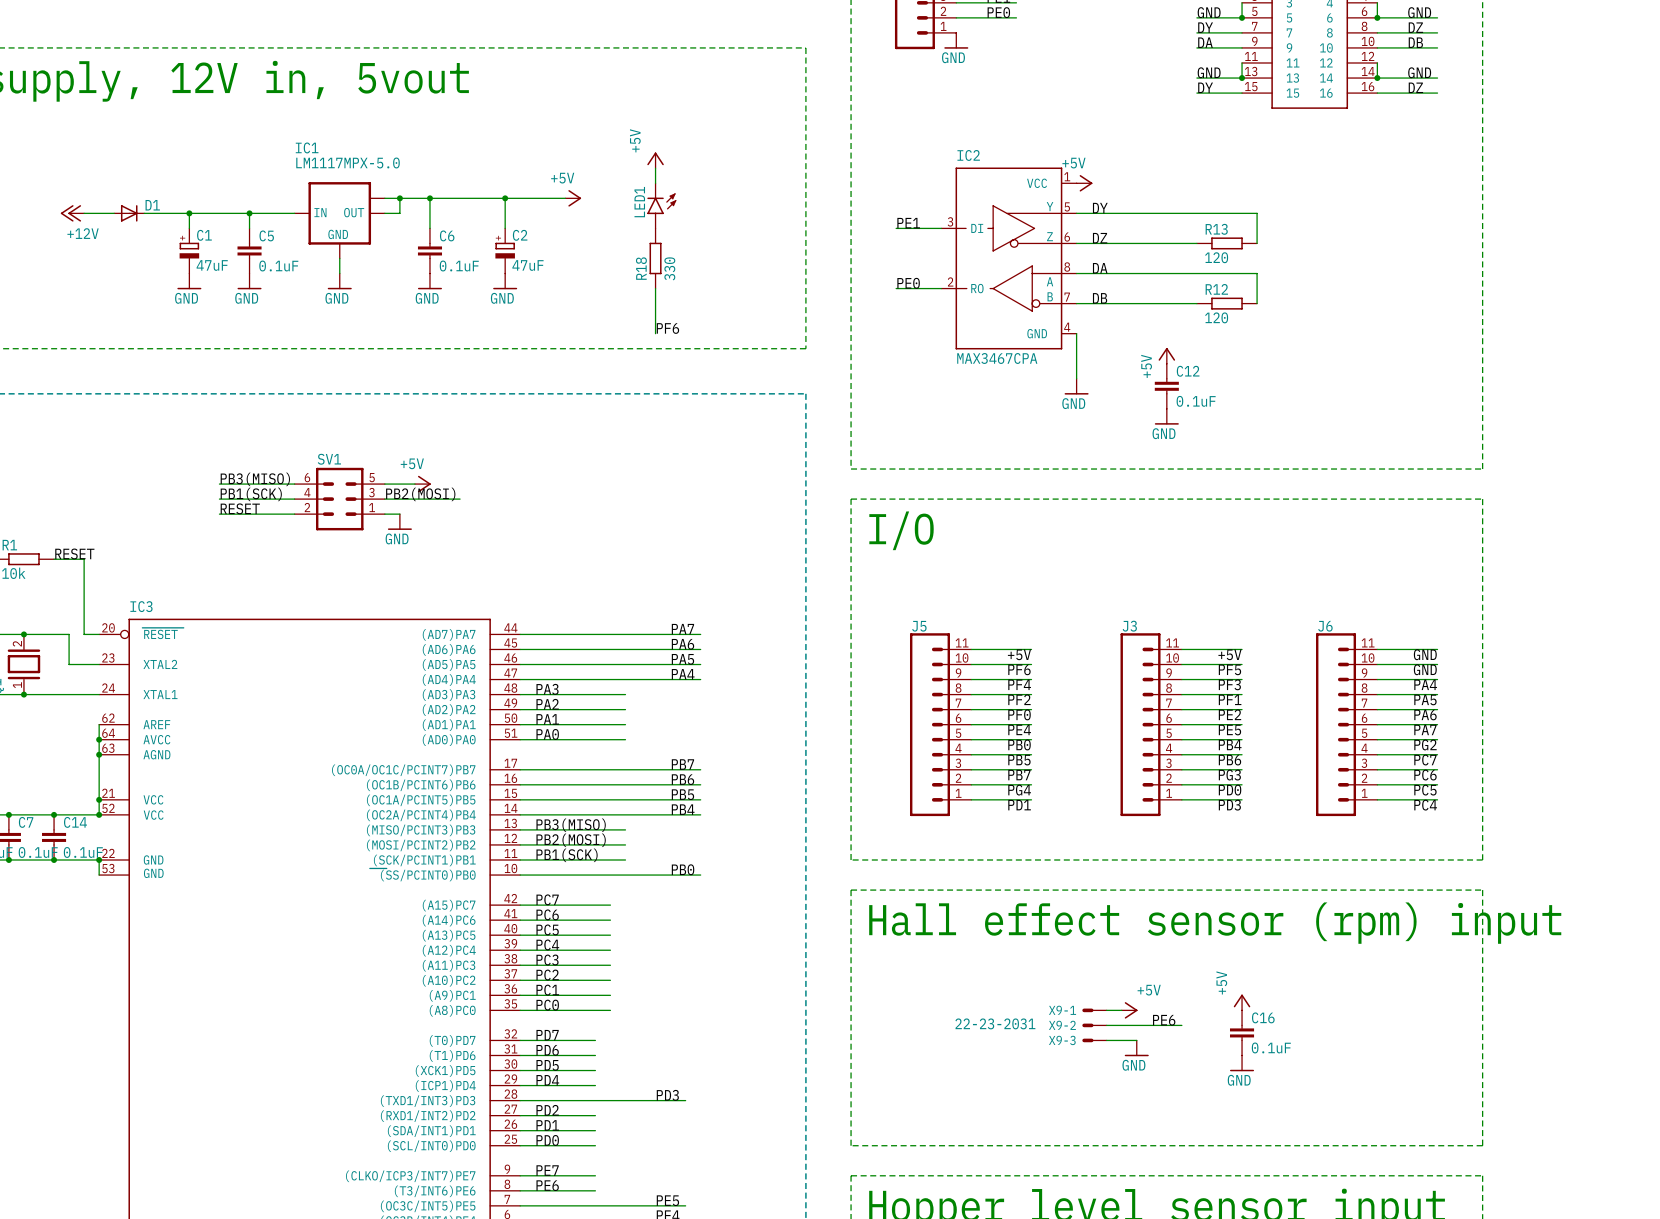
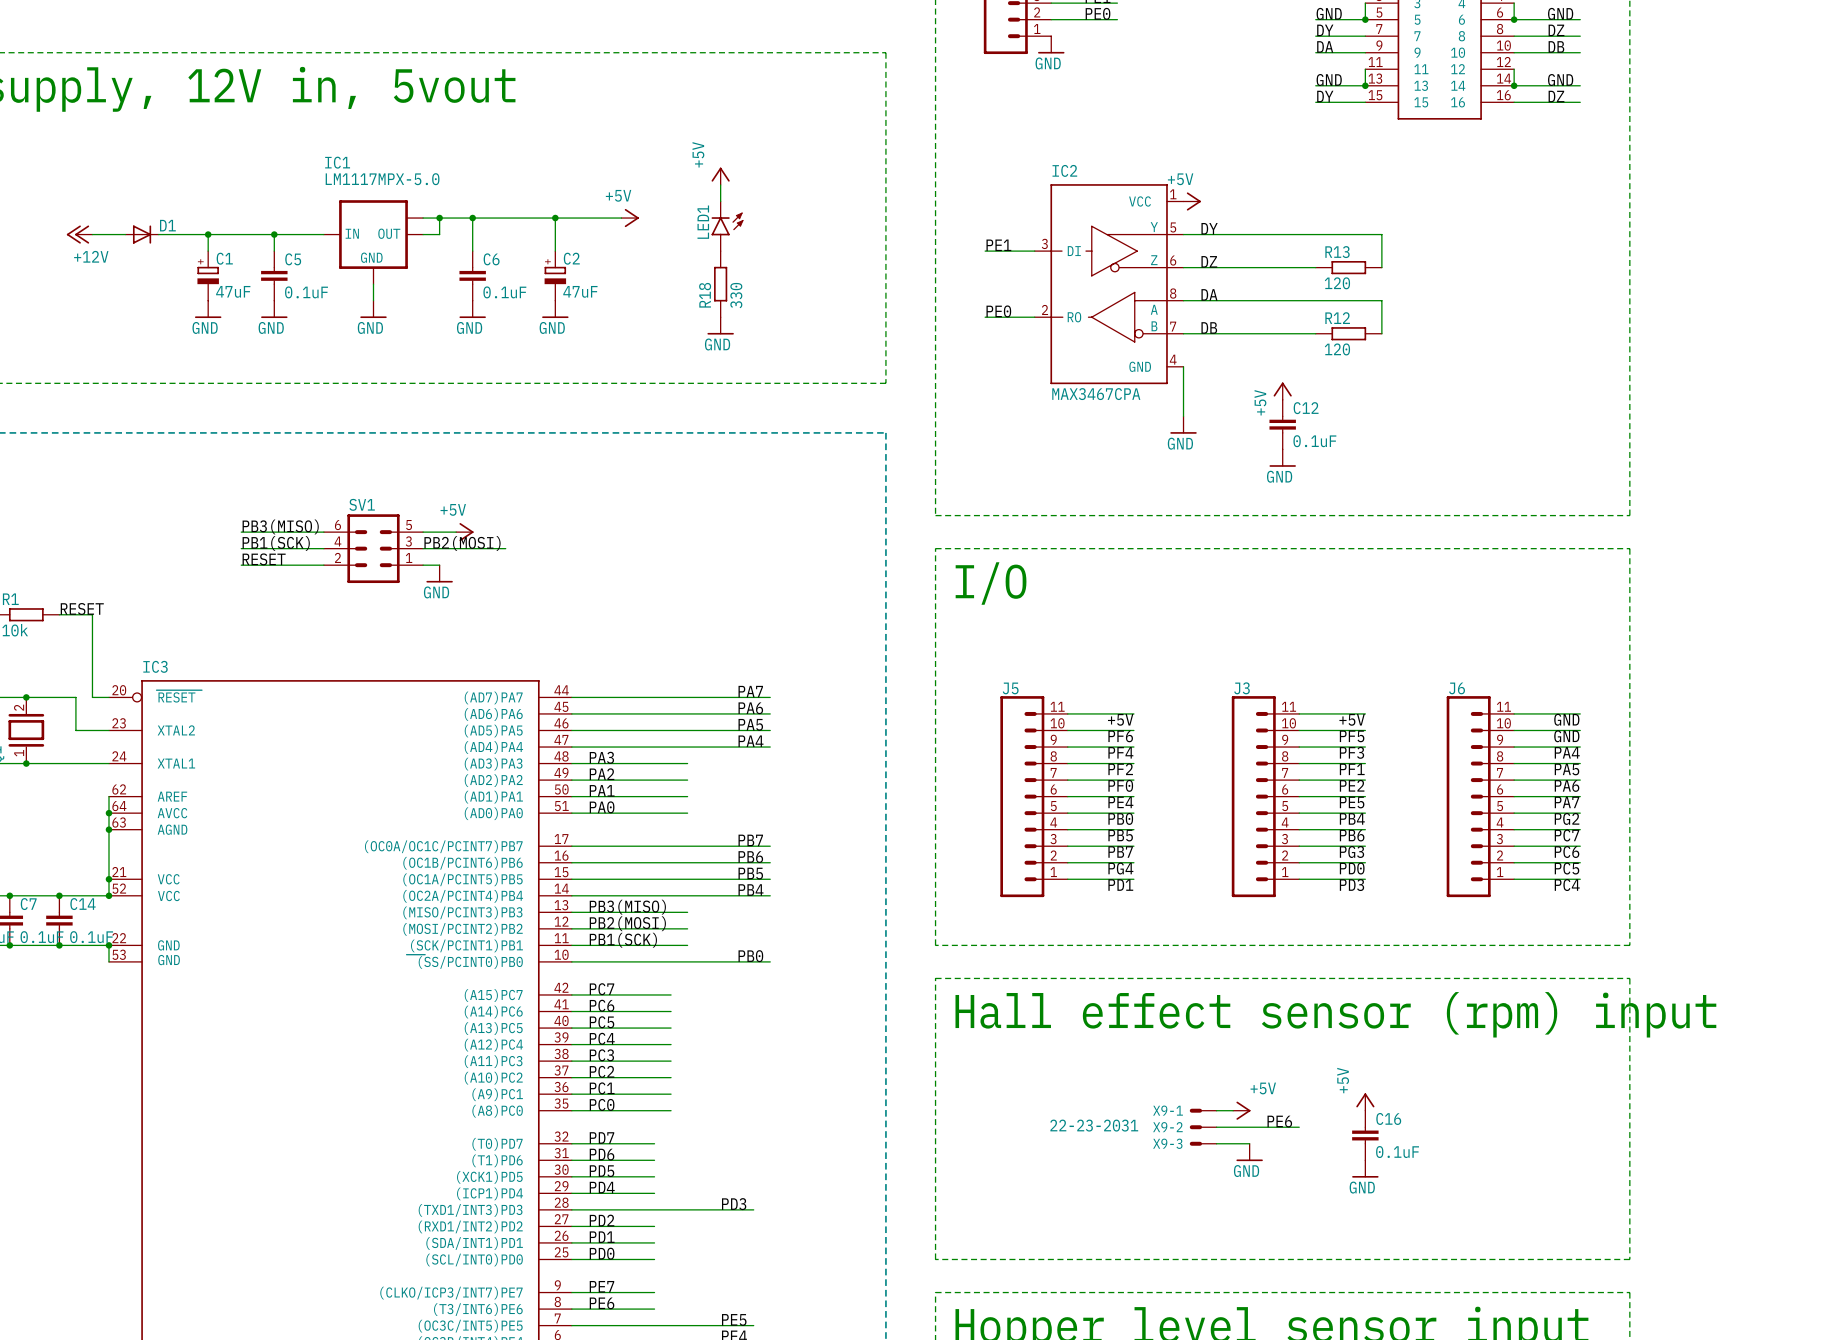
wire: (655, 288) (655, 333) -> none
power symbol: none -> GND (720, 325)
label: PF6 (667, 328) -> none

